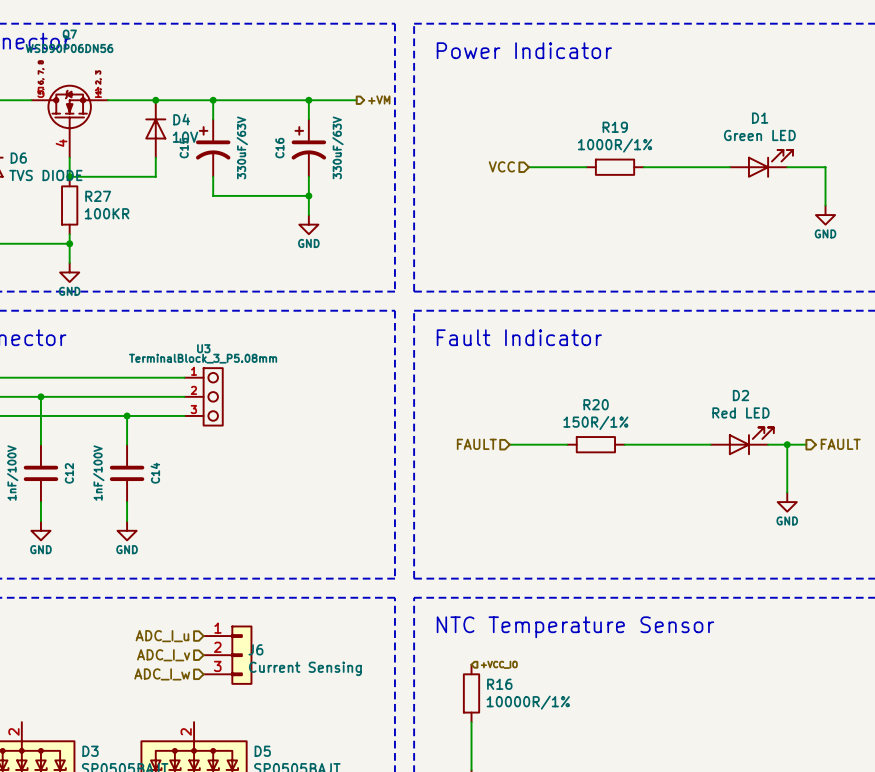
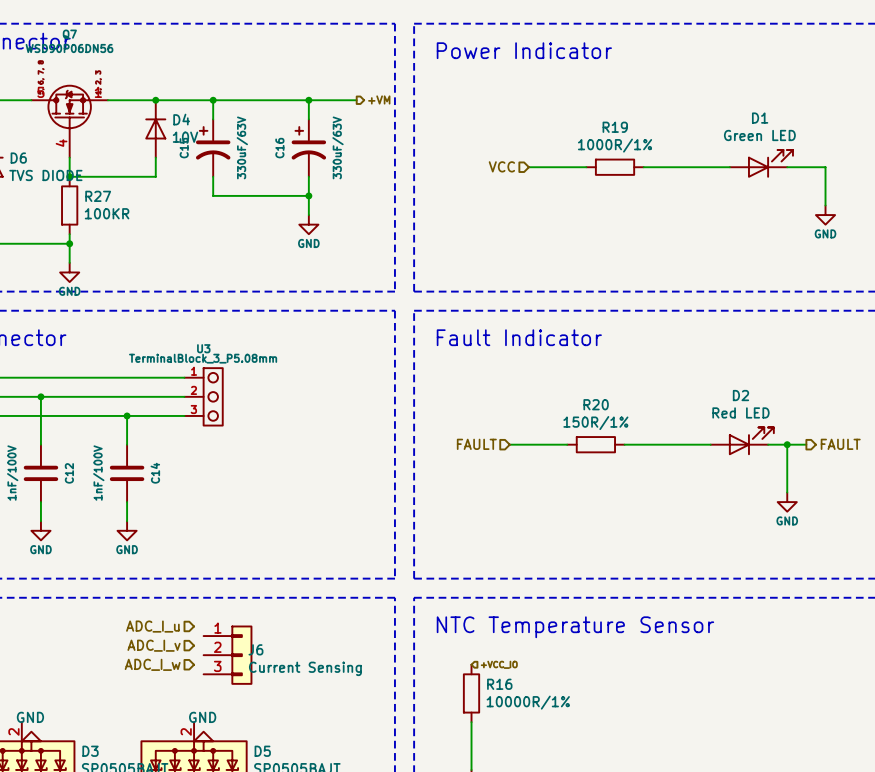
hierarchical label position: ADC_I_u (162, 636) -> ADC_I_u (152, 626)
hierarchical label position: ADC_I_v (163, 655) -> ADC_I_v (154, 645)
hierarchical label position: ADC_I_w (162, 674) -> ADC_I_w (152, 664)
power symbol: none -> GND (31, 741)
power symbol: none -> GND (203, 741)

